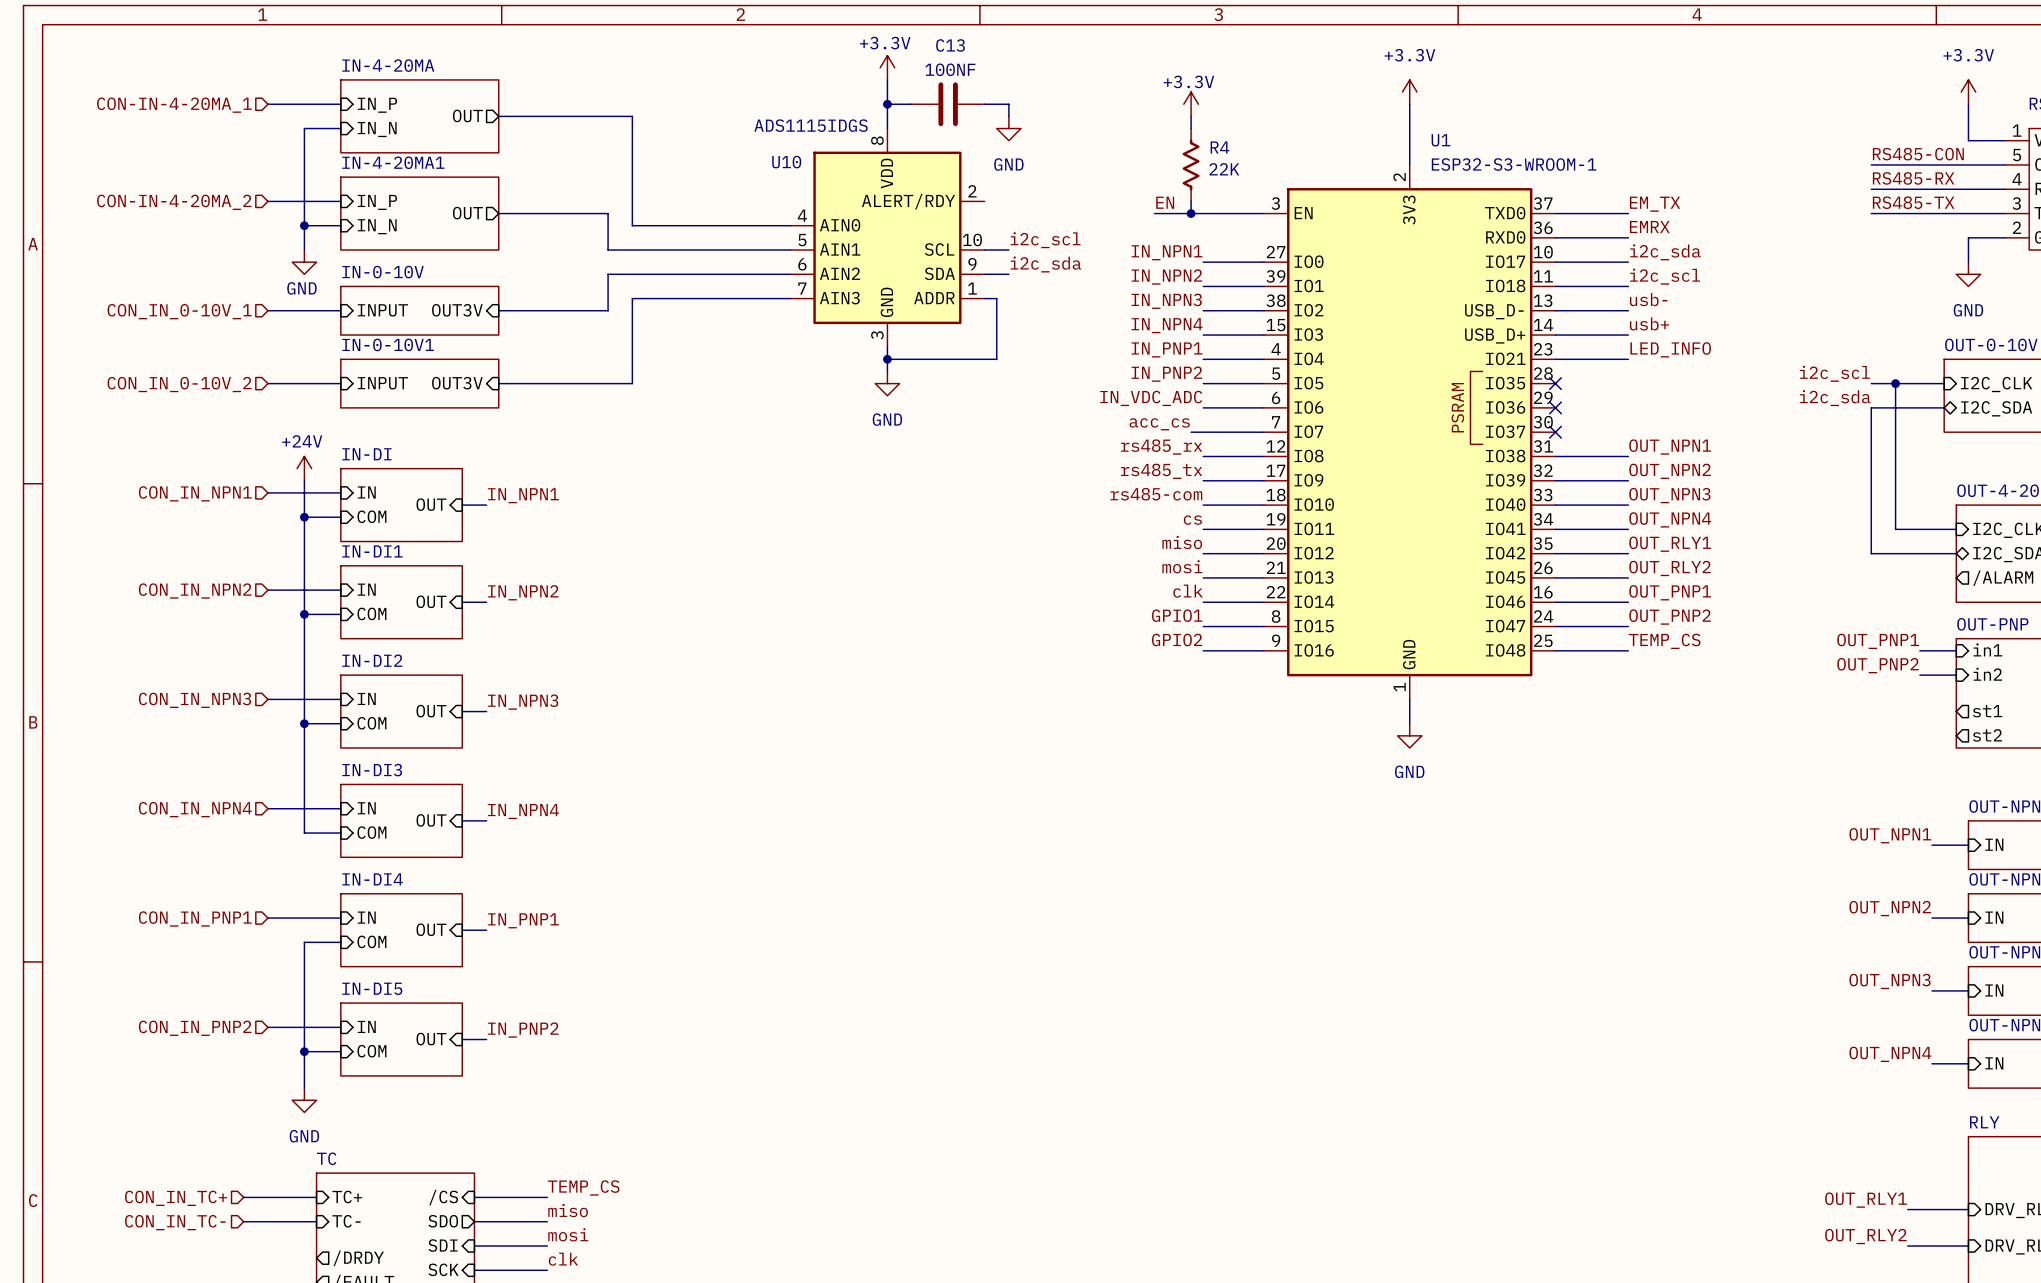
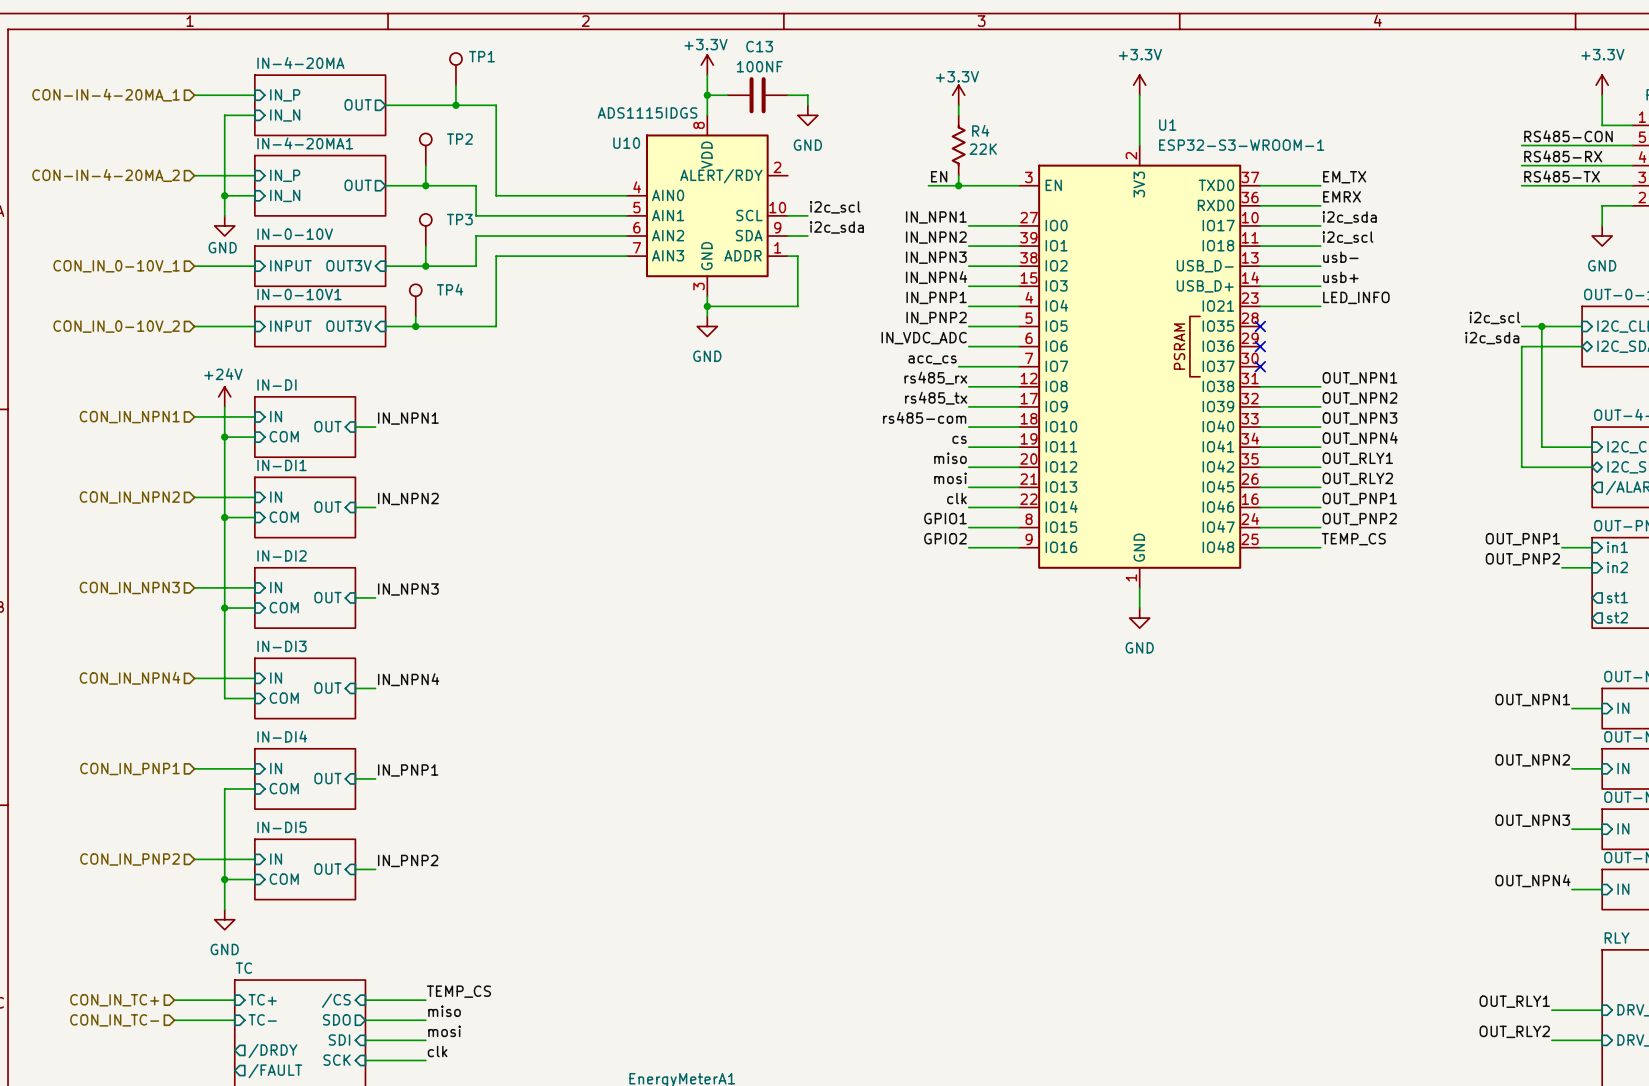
TP1: none -> (455, 69)
wire: none -> (455, 85) (455, 105)
junction: none -> (455, 105)
TP2: none -> (425, 149)
wire: none -> (425, 165) (425, 185)
junction: none -> (425, 185)
TP3: none -> (425, 229)
wire: none -> (425, 246) (425, 266)
junction: none -> (425, 266)
TP4: none -> (415, 300)
wire: none -> (415, 316) (415, 326)
junction: none -> (415, 326)

